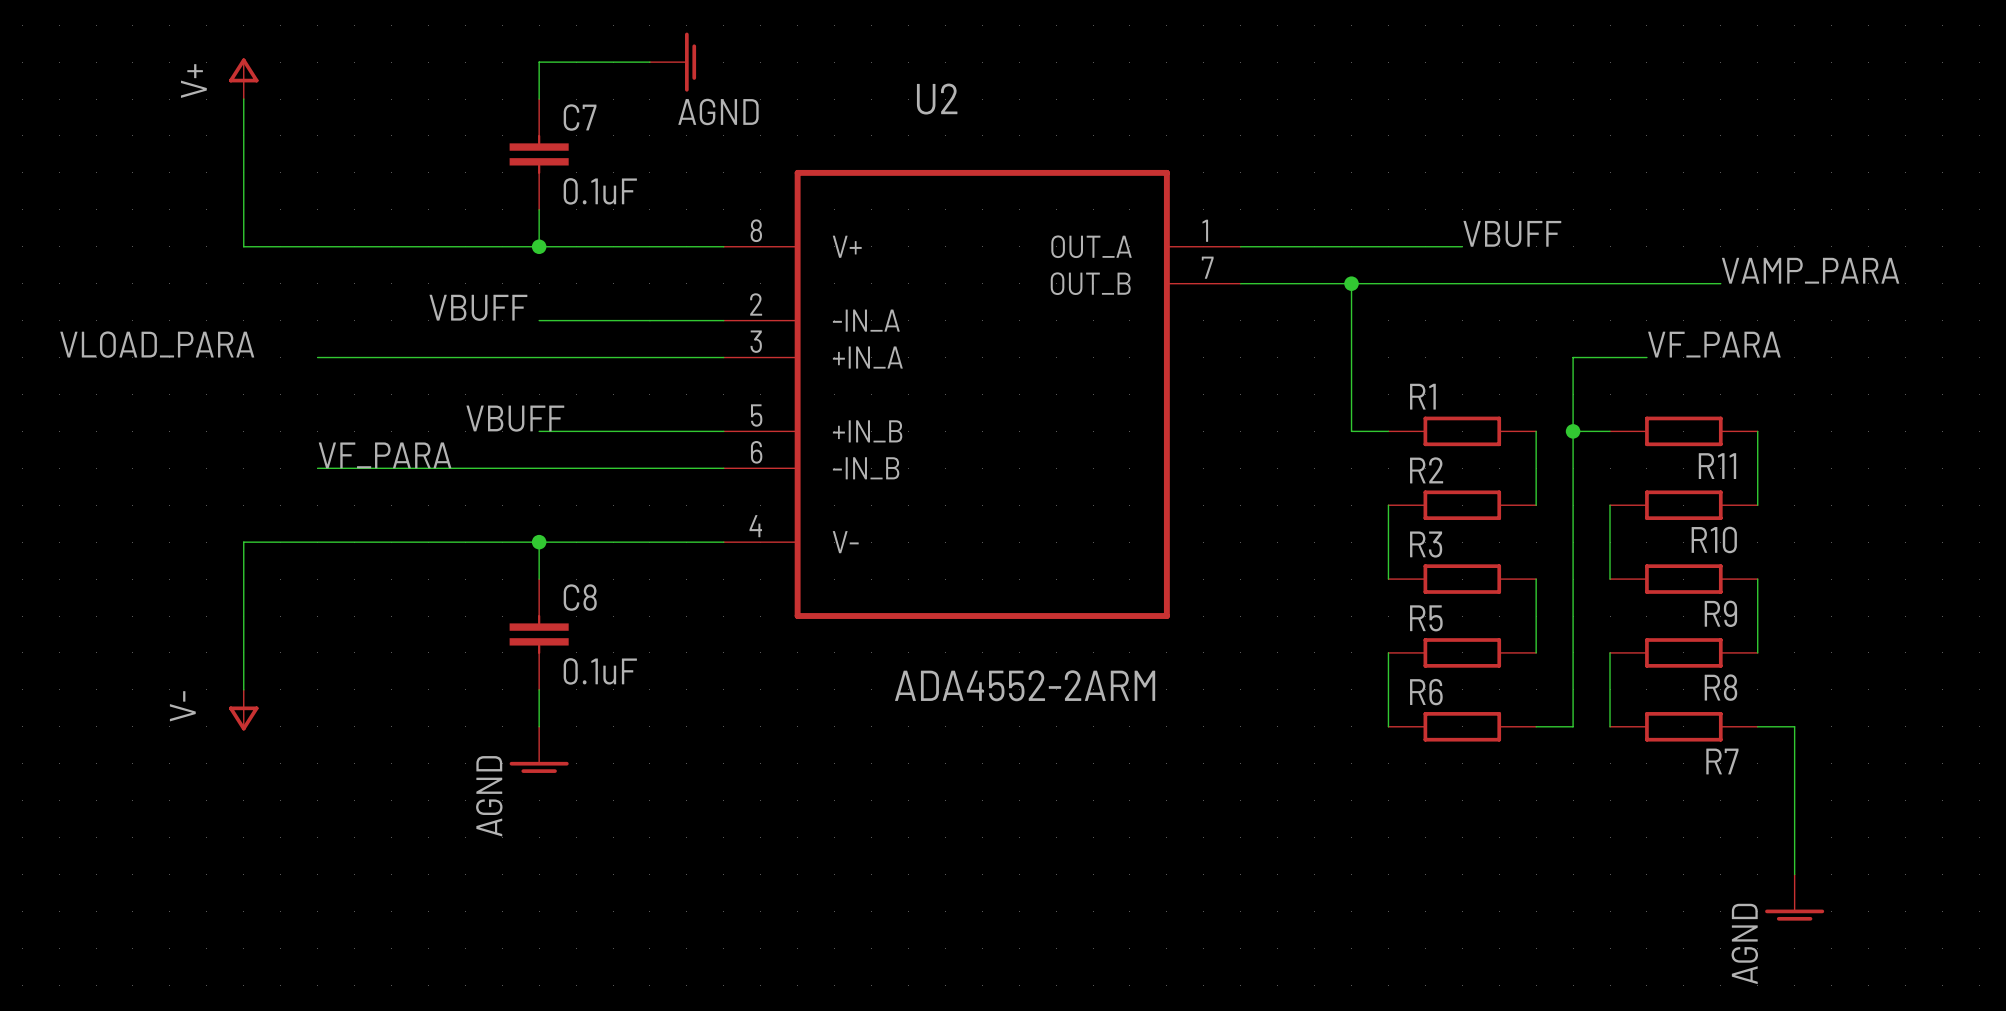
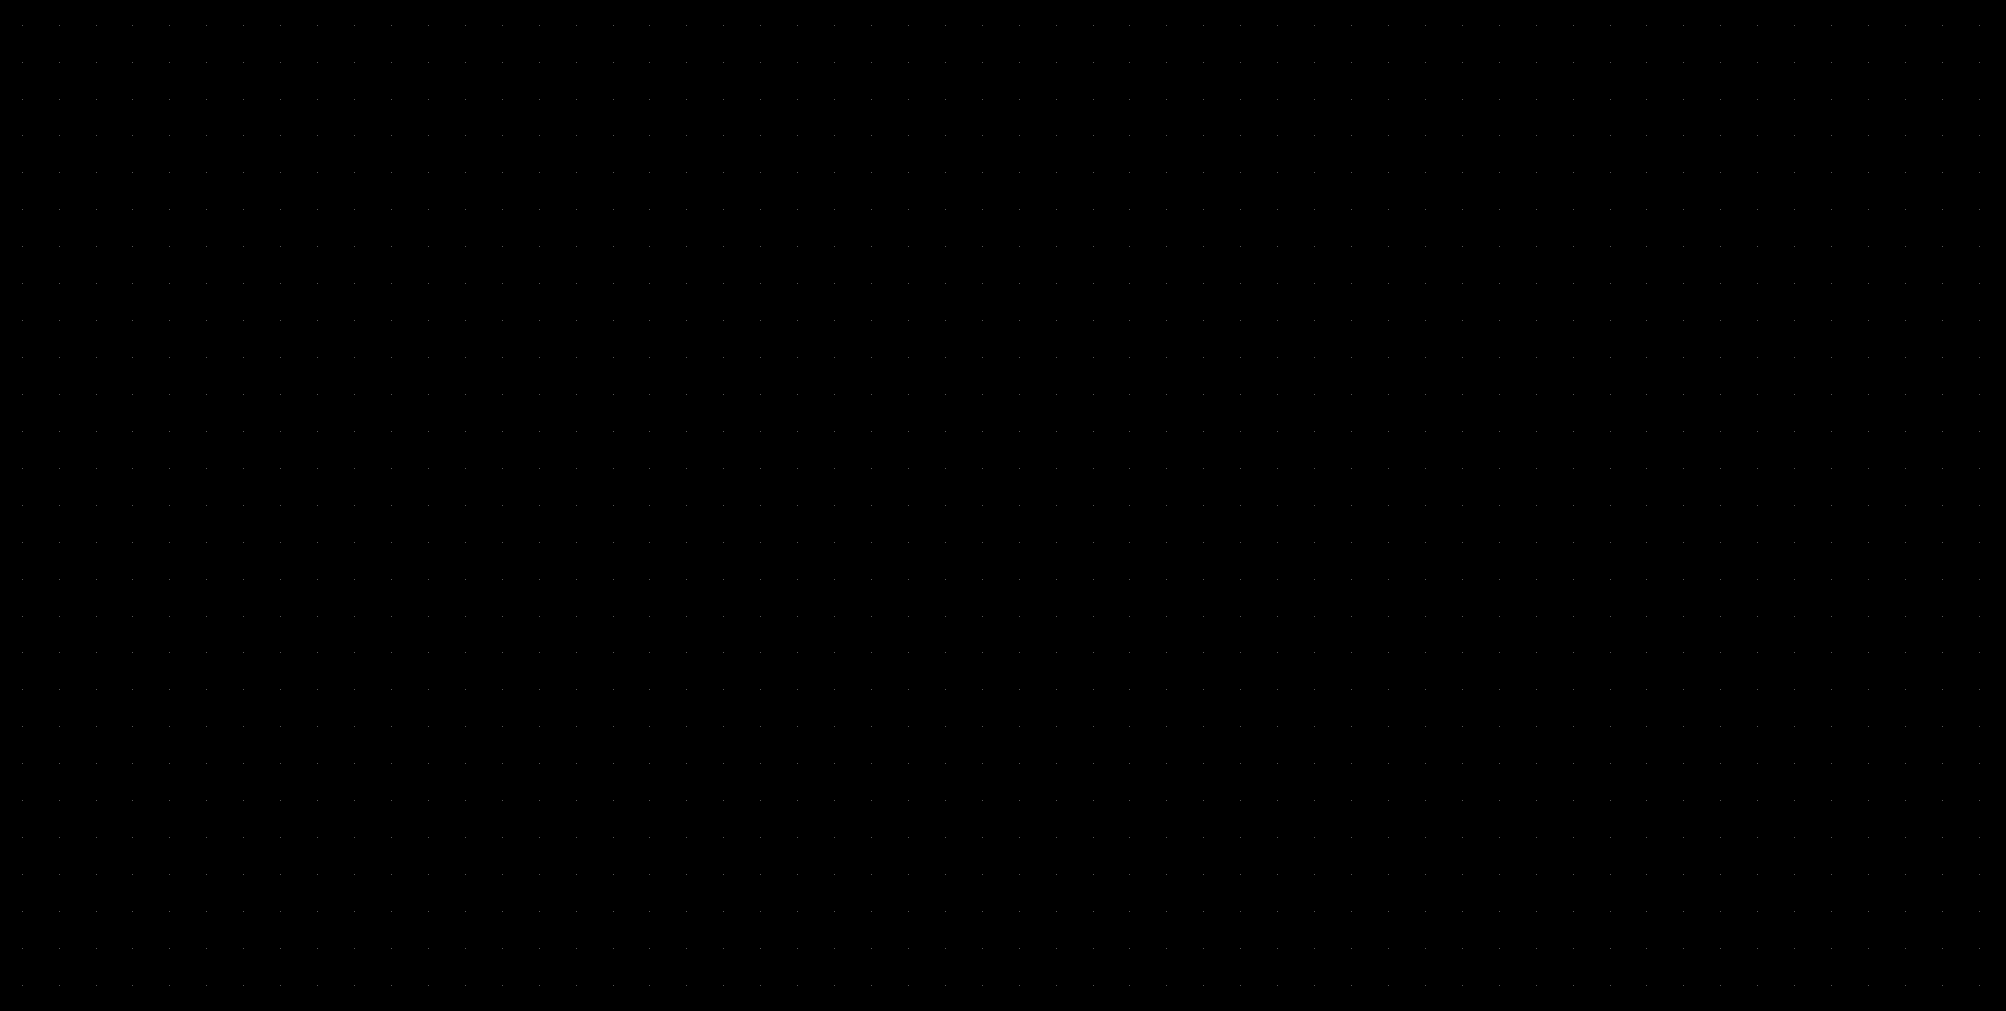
wire: (649, 62) (539, 62) (539, 99) -> none
power symbol: AGND (673, 62) -> none
power symbol: V+ (243, 78) -> none
wire: (243, 99) (243, 246) (723, 246) -> none
C7: 0.1uF (539, 154) -> none
wire: (539, 209) (539, 246) -> none
label: VBUFF (1512, 233) -> none
junction: (539, 246) -> none
wire: (1240, 246) (1462, 246) -> none
label: VAMP_PARA (1810, 270) -> none
wire: (1240, 283) (1720, 283) -> none
wire: (1351, 283) (1351, 431) (1388, 431) -> none
junction: (1351, 283) -> none
label: VBUFF (478, 307) -> none
wire: (539, 320) (723, 320) -> none
label: VLOAD_PARA (157, 344) -> none
label: VF_PARA (1714, 344) -> none
wire: (317, 357) (723, 357) -> none
wire: (1646, 357) (1573, 357) (1573, 726) (1536, 726) -> none
U2: ADA4552-2ARM (982, 394) -> none
label: VBUFF (515, 418) -> none
wire: (539, 431) (723, 431) -> none
R1: (1462, 431) -> none
wire: (1536, 431) (1536, 505) -> none
wire: (1573, 431) (1610, 431) -> none
junction: (1573, 431) -> none
R11: (1683, 431) -> none
wire: (1757, 431) (1757, 505) -> none
label: VF_PARA (385, 455) -> none
wire: (317, 468) (723, 468) -> none
wire: (1388, 505) (1388, 579) -> none
R2: (1462, 505) -> none
wire: (1610, 505) (1610, 579) -> none
R10: (1683, 505) -> none
wire: (539, 542) (539, 579) -> none
junction: (539, 542) -> none
wire: (723, 542) (243, 542) (243, 689) -> none
R3: (1462, 579) -> none
wire: (1536, 579) (1536, 652) -> none
R9: (1683, 579) -> none
wire: (1757, 579) (1757, 652) -> none
C8: 0.1uF (539, 634) -> none
wire: (1388, 652) (1388, 726) -> none
R5: (1462, 652) -> none
wire: (1610, 652) (1610, 726) -> none
R8: (1683, 652) -> none
wire: (539, 689) (539, 726) -> none
power symbol: V- (243, 710) -> none
R6: (1462, 726) -> none
R7: (1683, 726) -> none
wire: (1757, 726) (1794, 726) (1794, 874) -> none
power symbol: AGND (539, 749) -> none
power symbol: AGND (1794, 897) -> none

